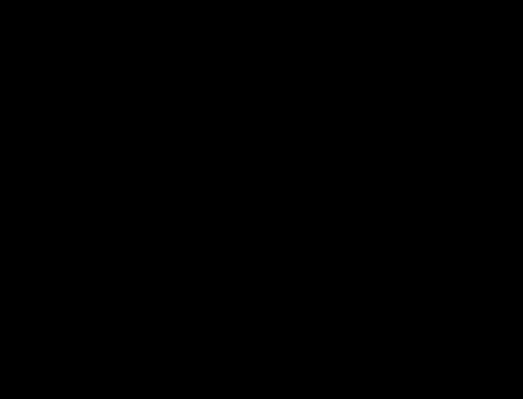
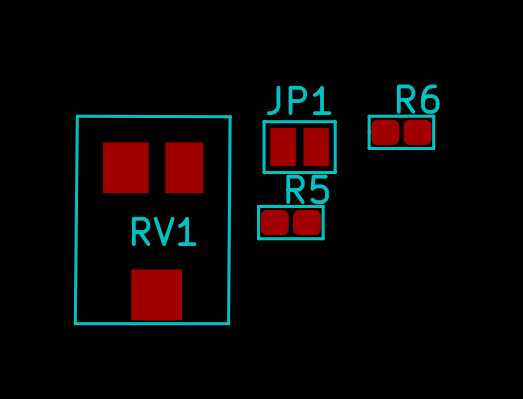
R6: none -> (401, 132)
JP1: none -> (299, 147)
RV1: none -> (152, 219)
R5: none -> (290, 222)

